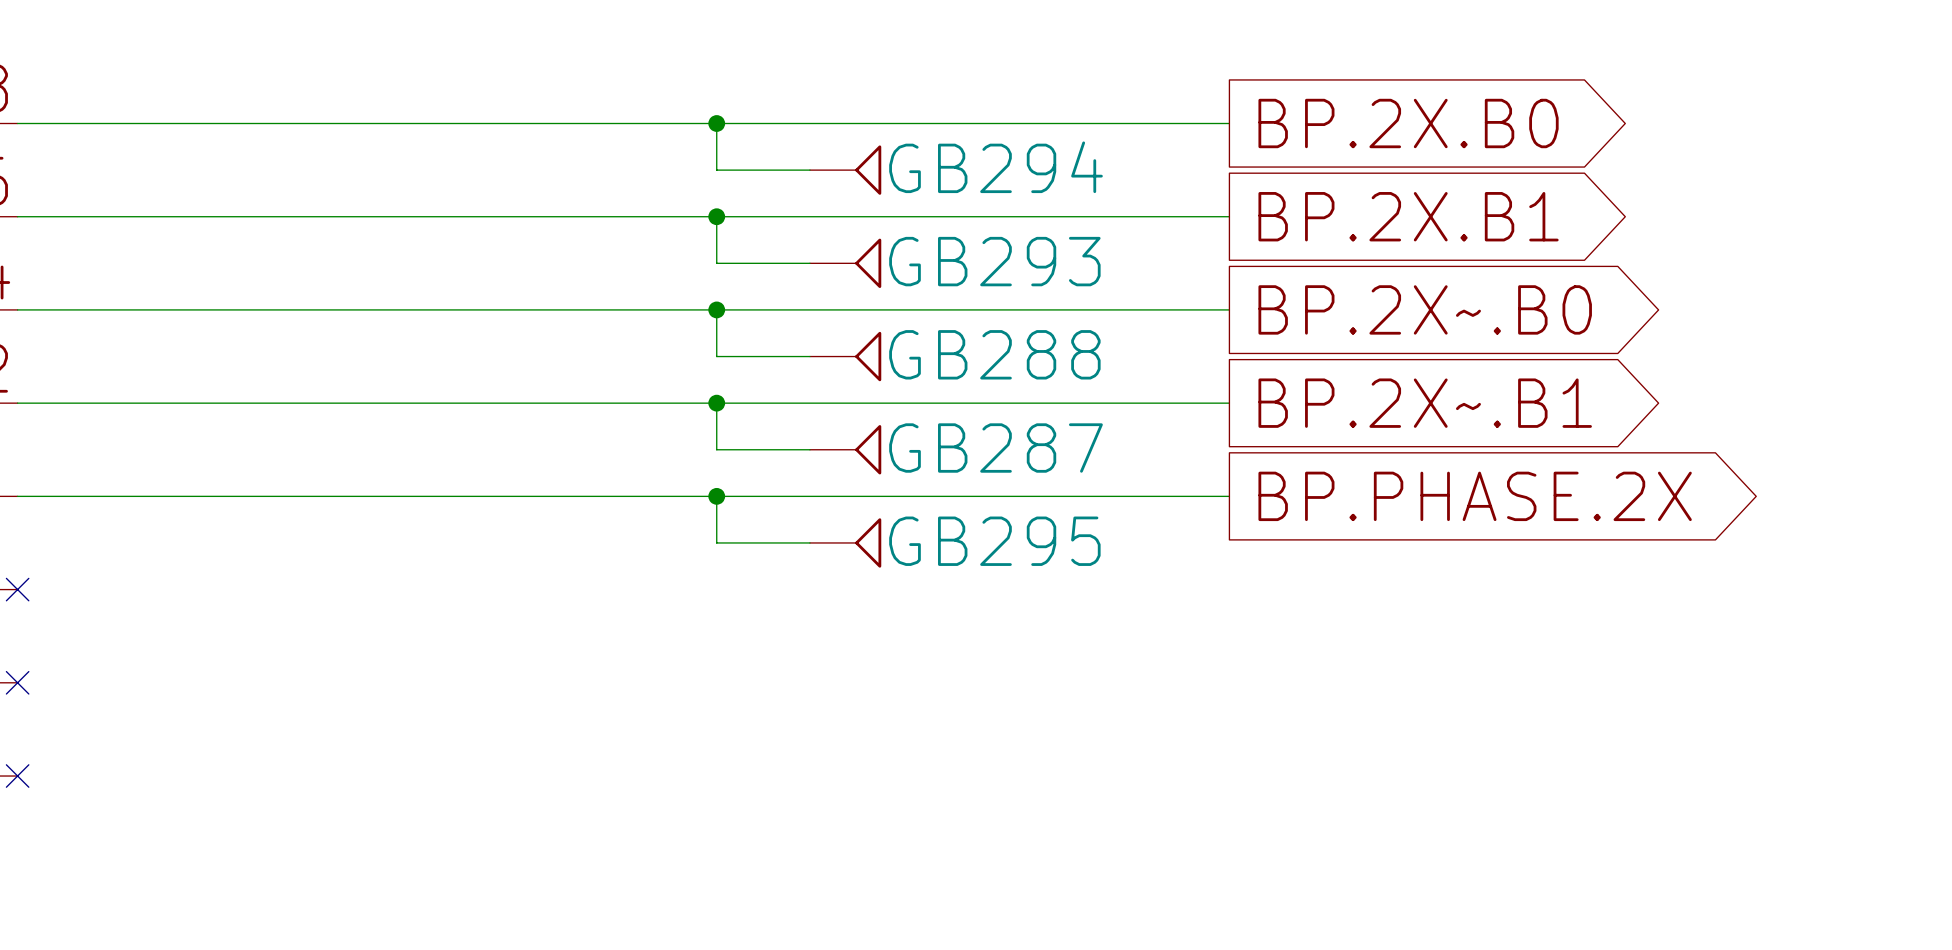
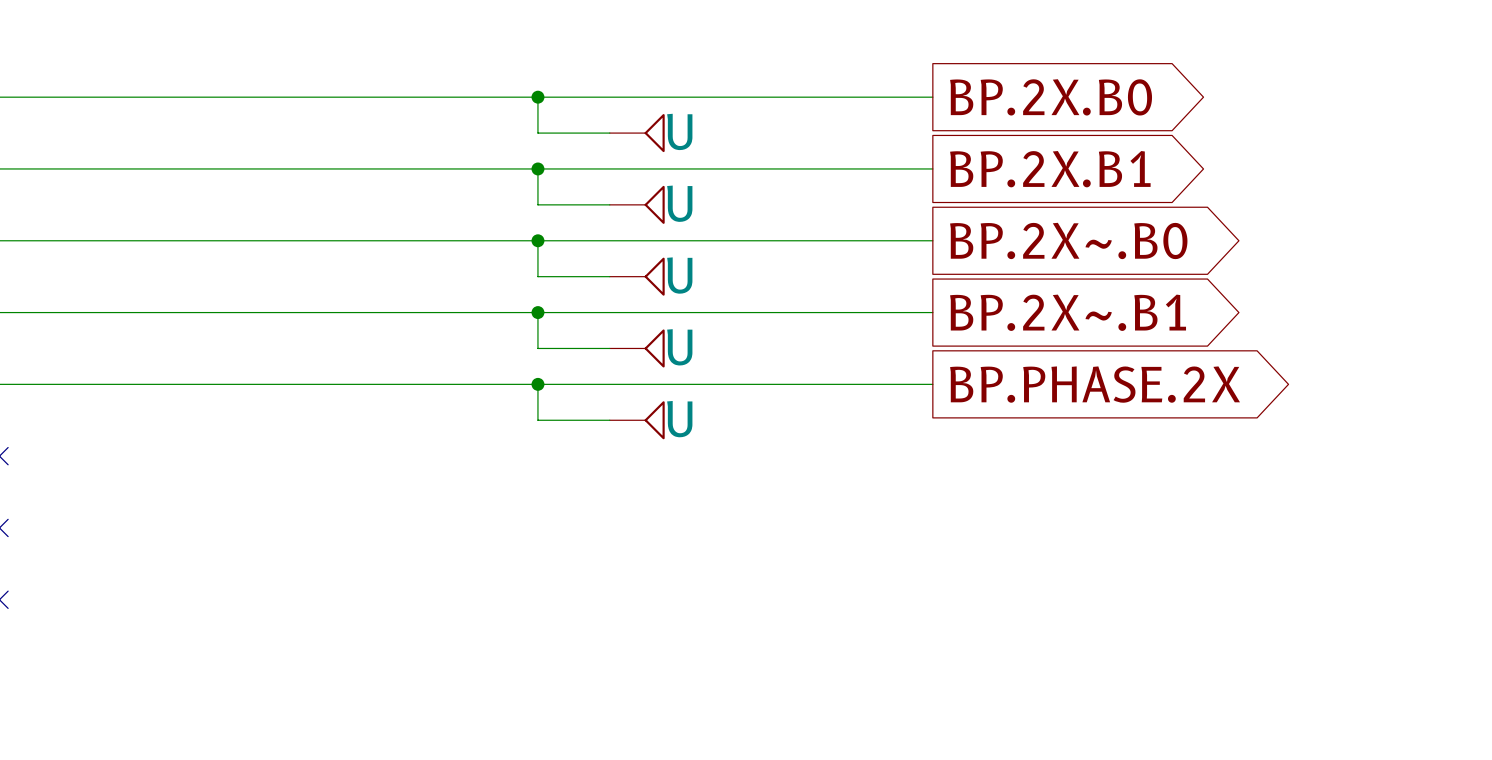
GB294 name: GB294 (996, 167) -> U (679, 131)
GB293 name: GB293 (994, 261) -> U (679, 203)
GB288 name: GB288 (994, 354) -> U (679, 275)
GB287 name: GB287 (996, 448) -> U (679, 347)
GB295 name: GB295 (994, 541) -> U (679, 419)

